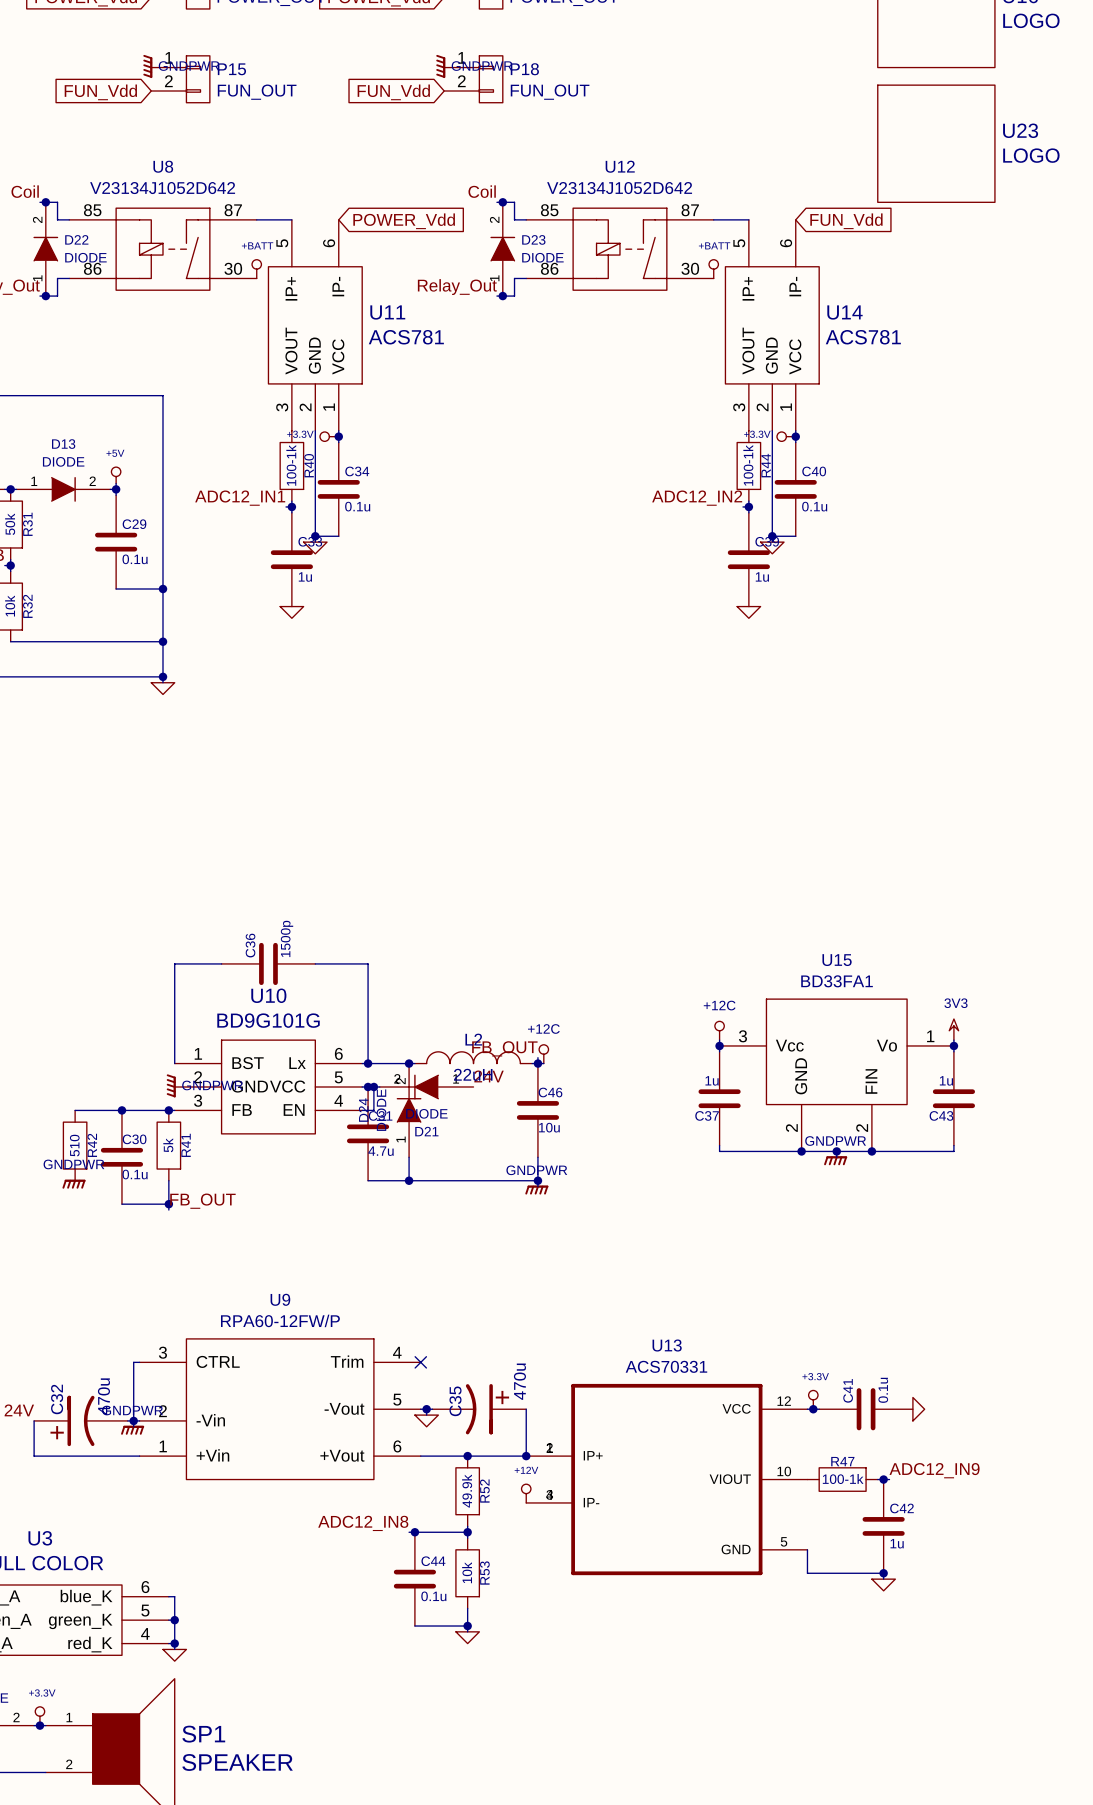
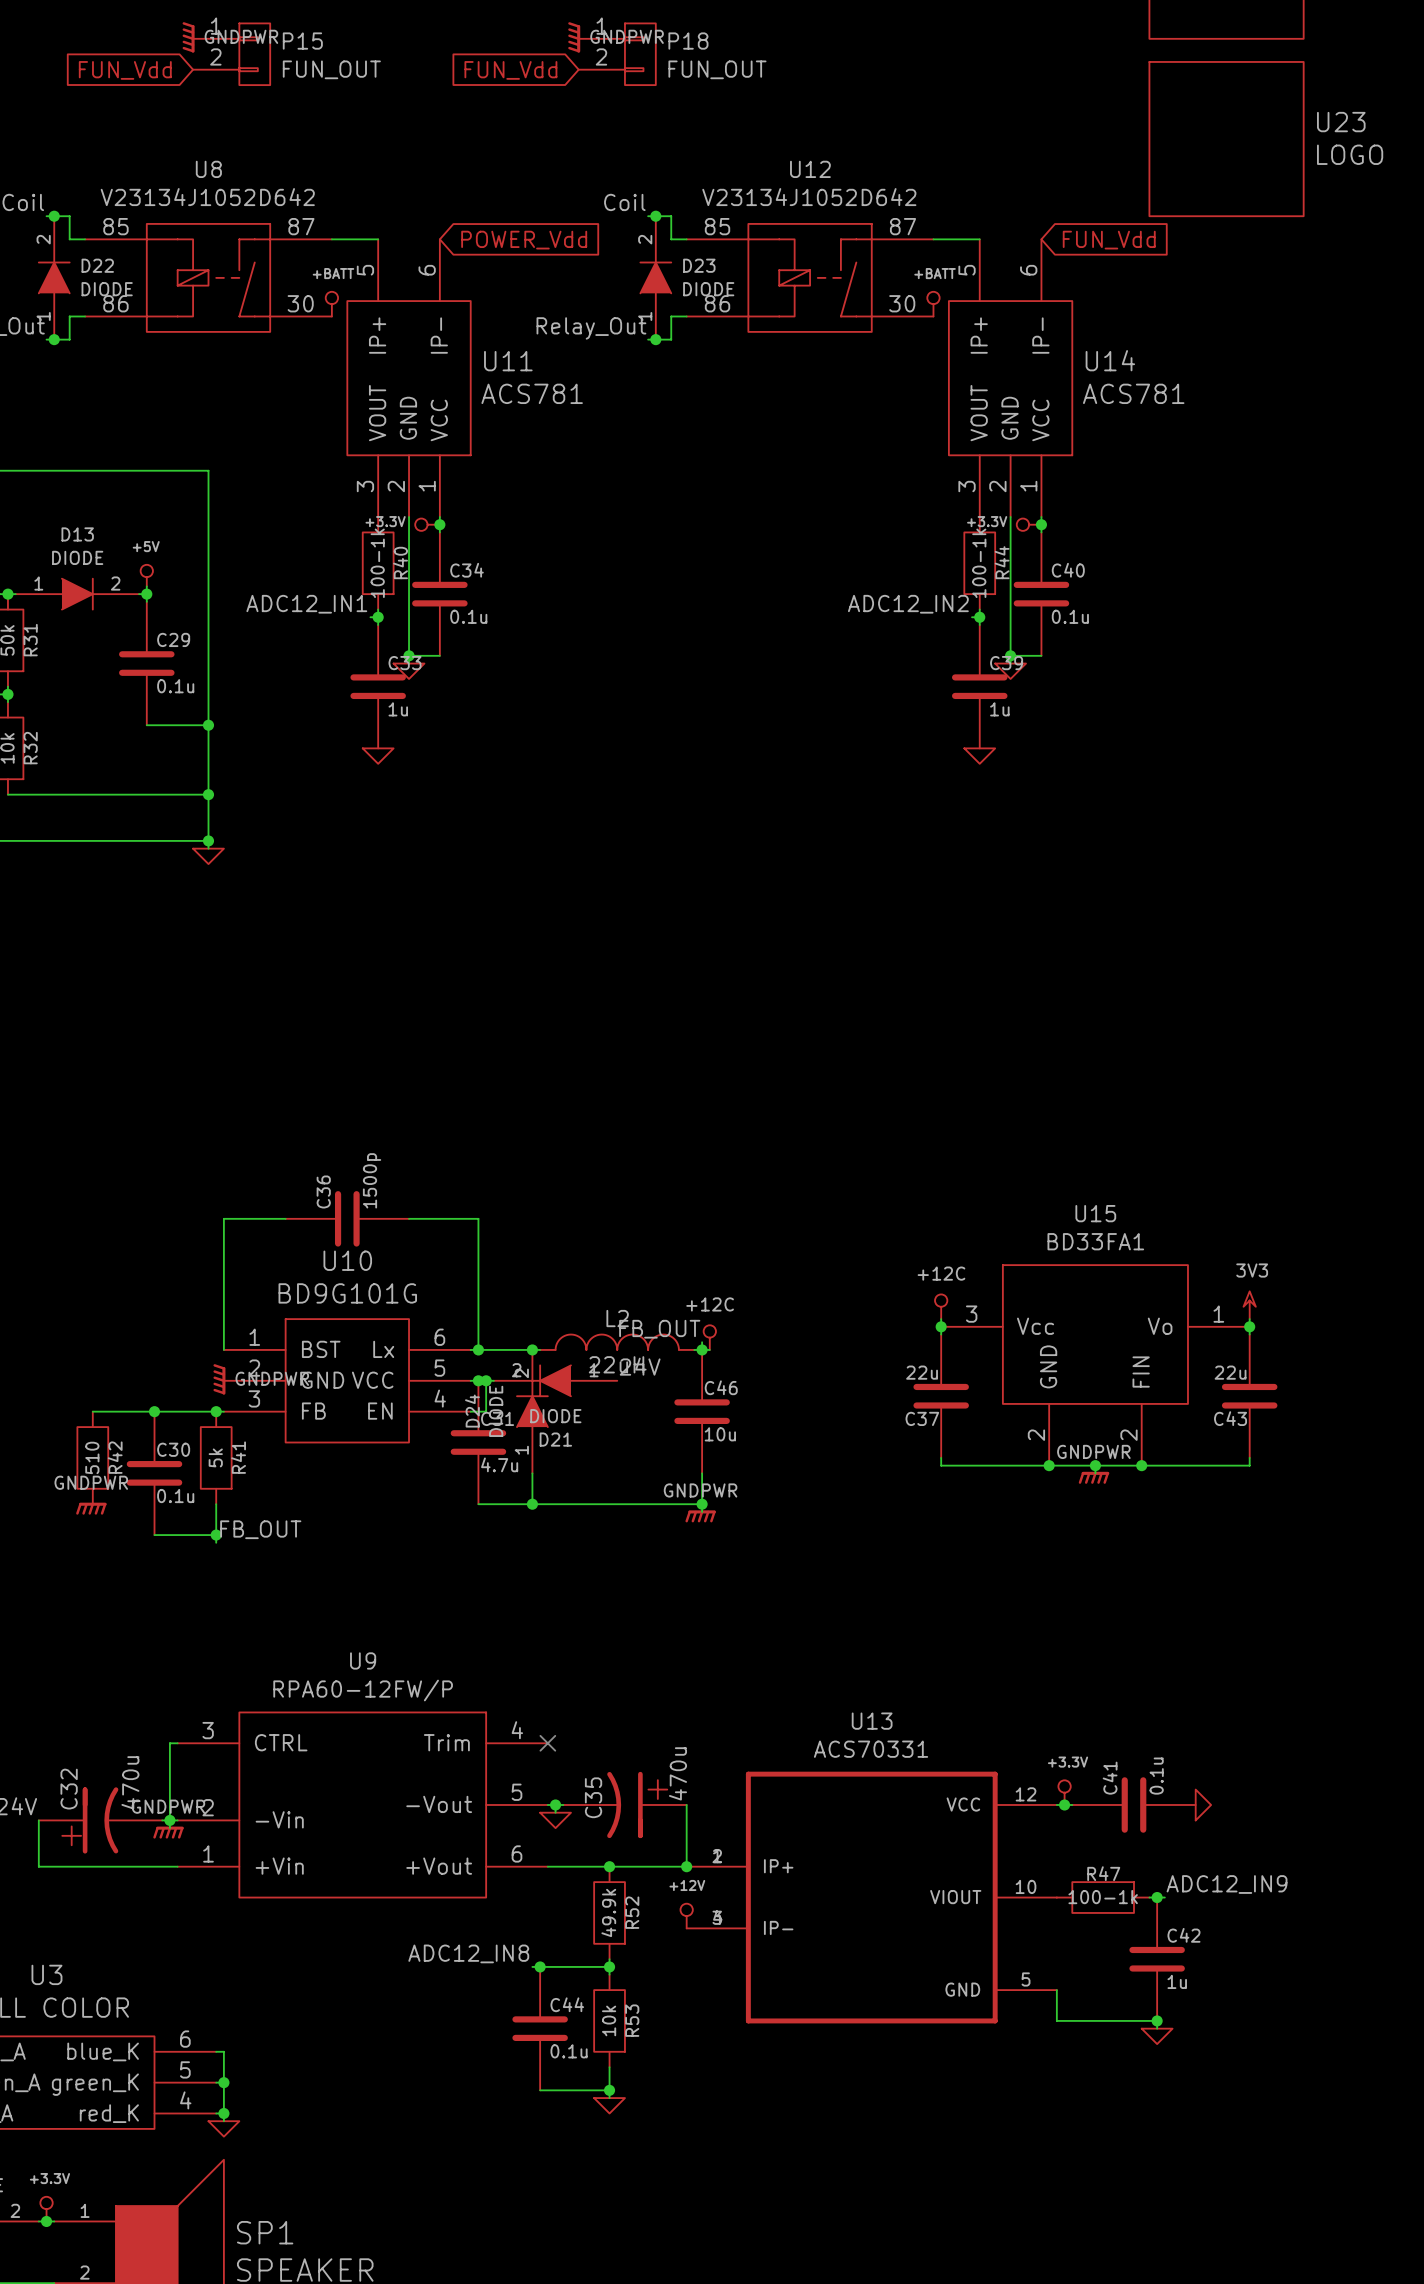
C37 value: 1u (712, 1080) -> 22u (922, 1372)
C43 value: 1u (946, 1080) -> 22u (1230, 1372)

